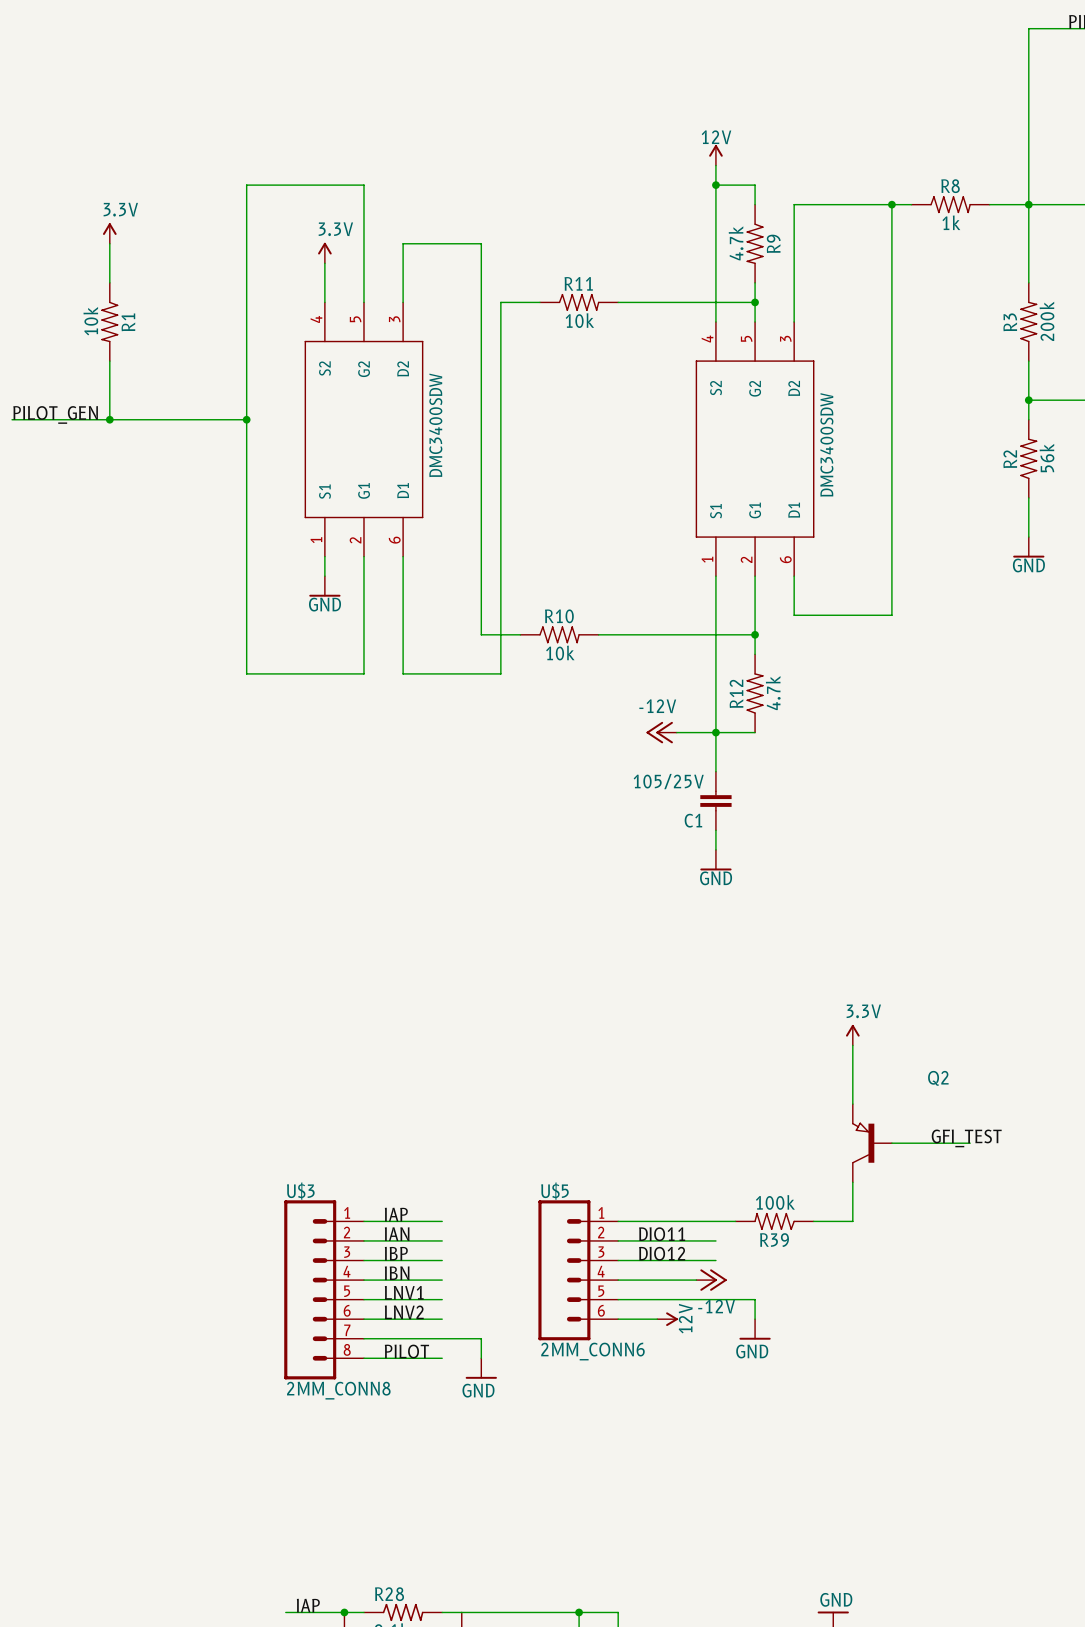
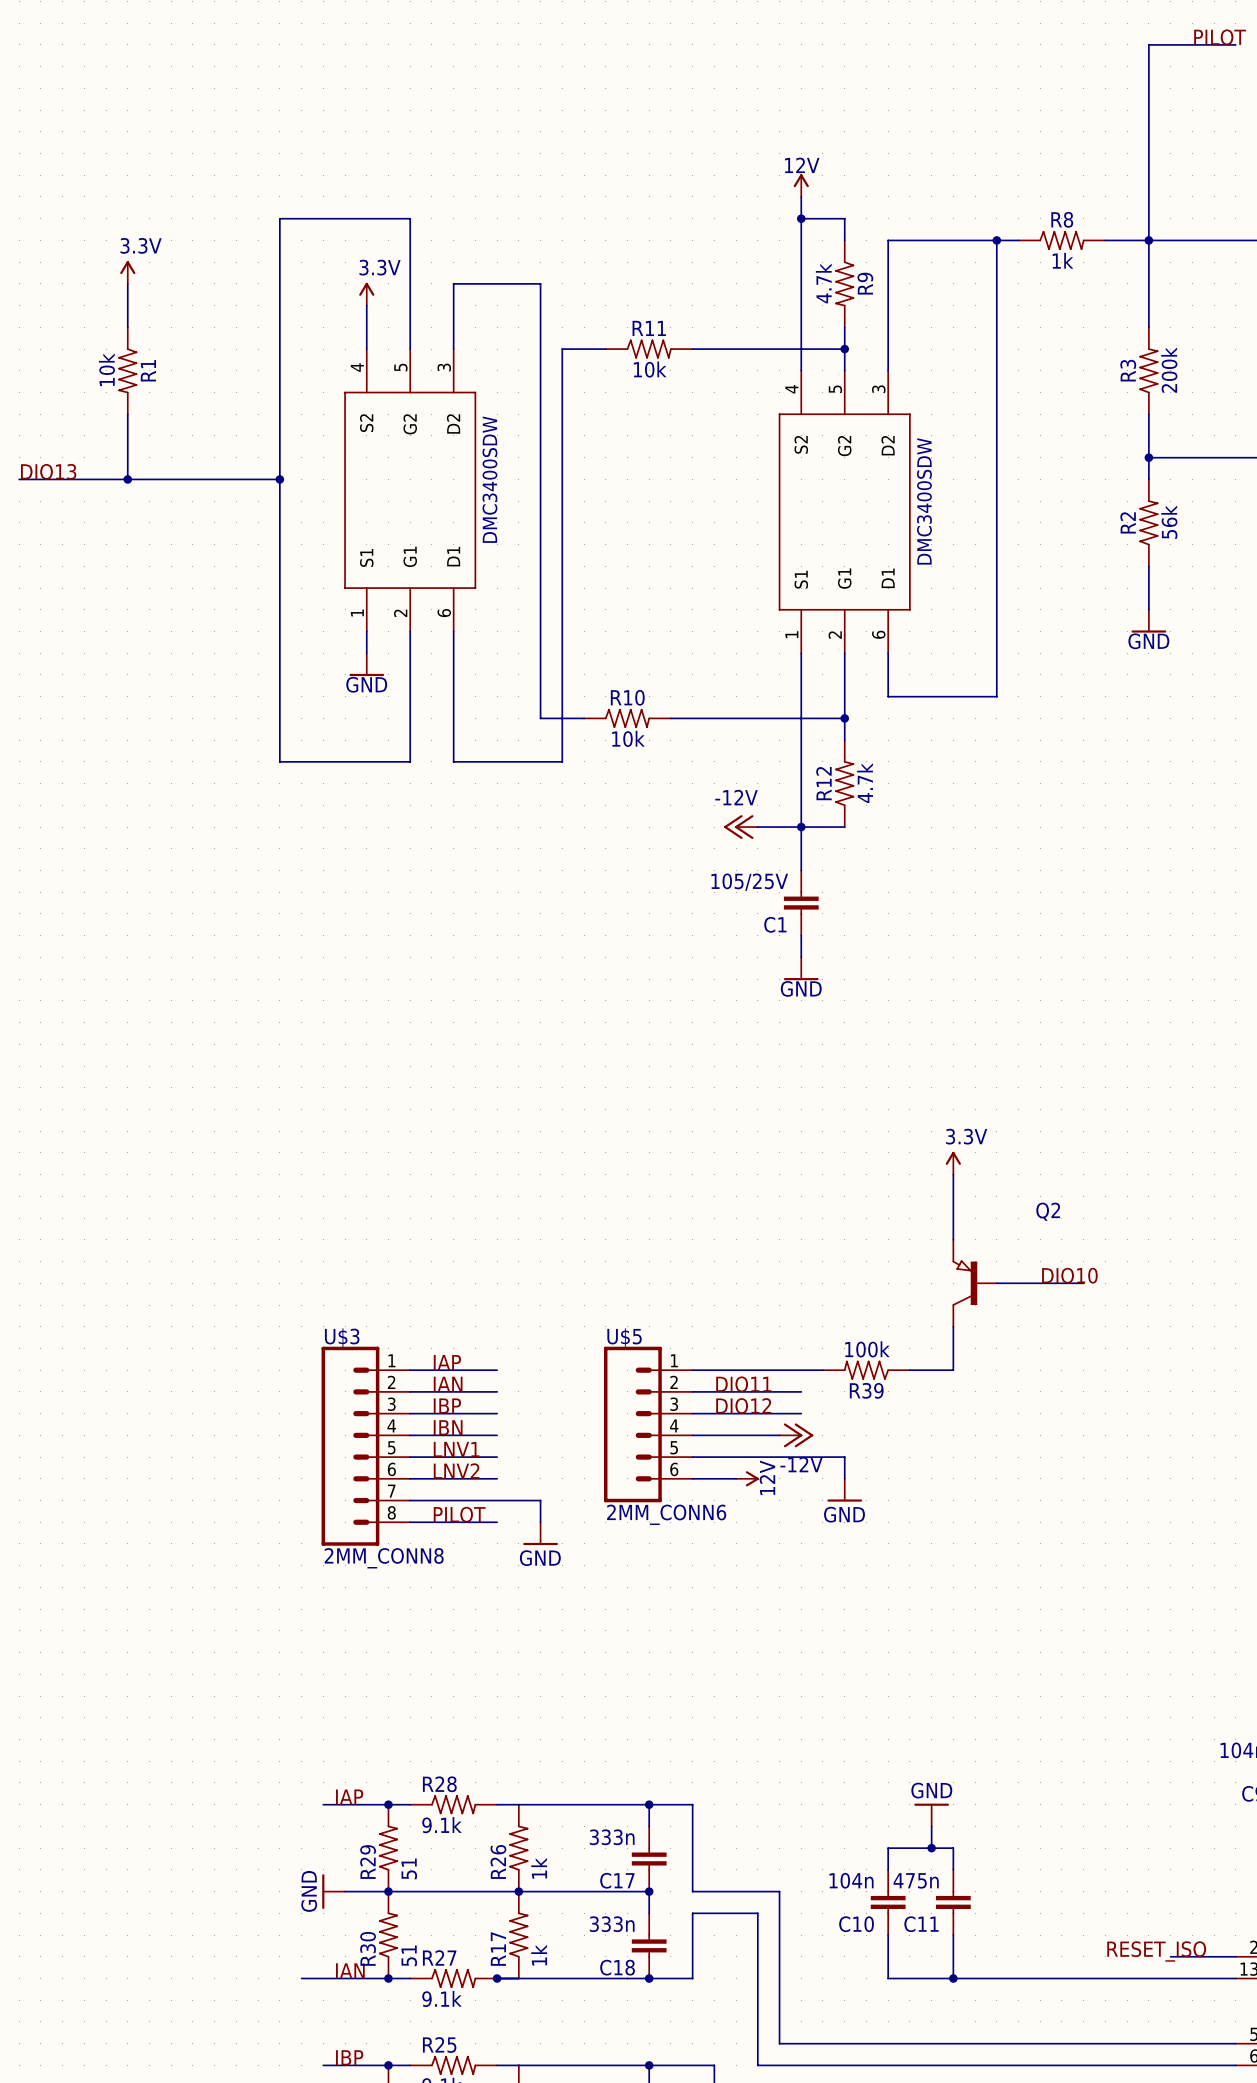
label: PILOT_GEN (55, 414) -> DIO13 (48, 471)
label: GFI_TEST (966, 1138) -> DIO10 (1069, 1275)

